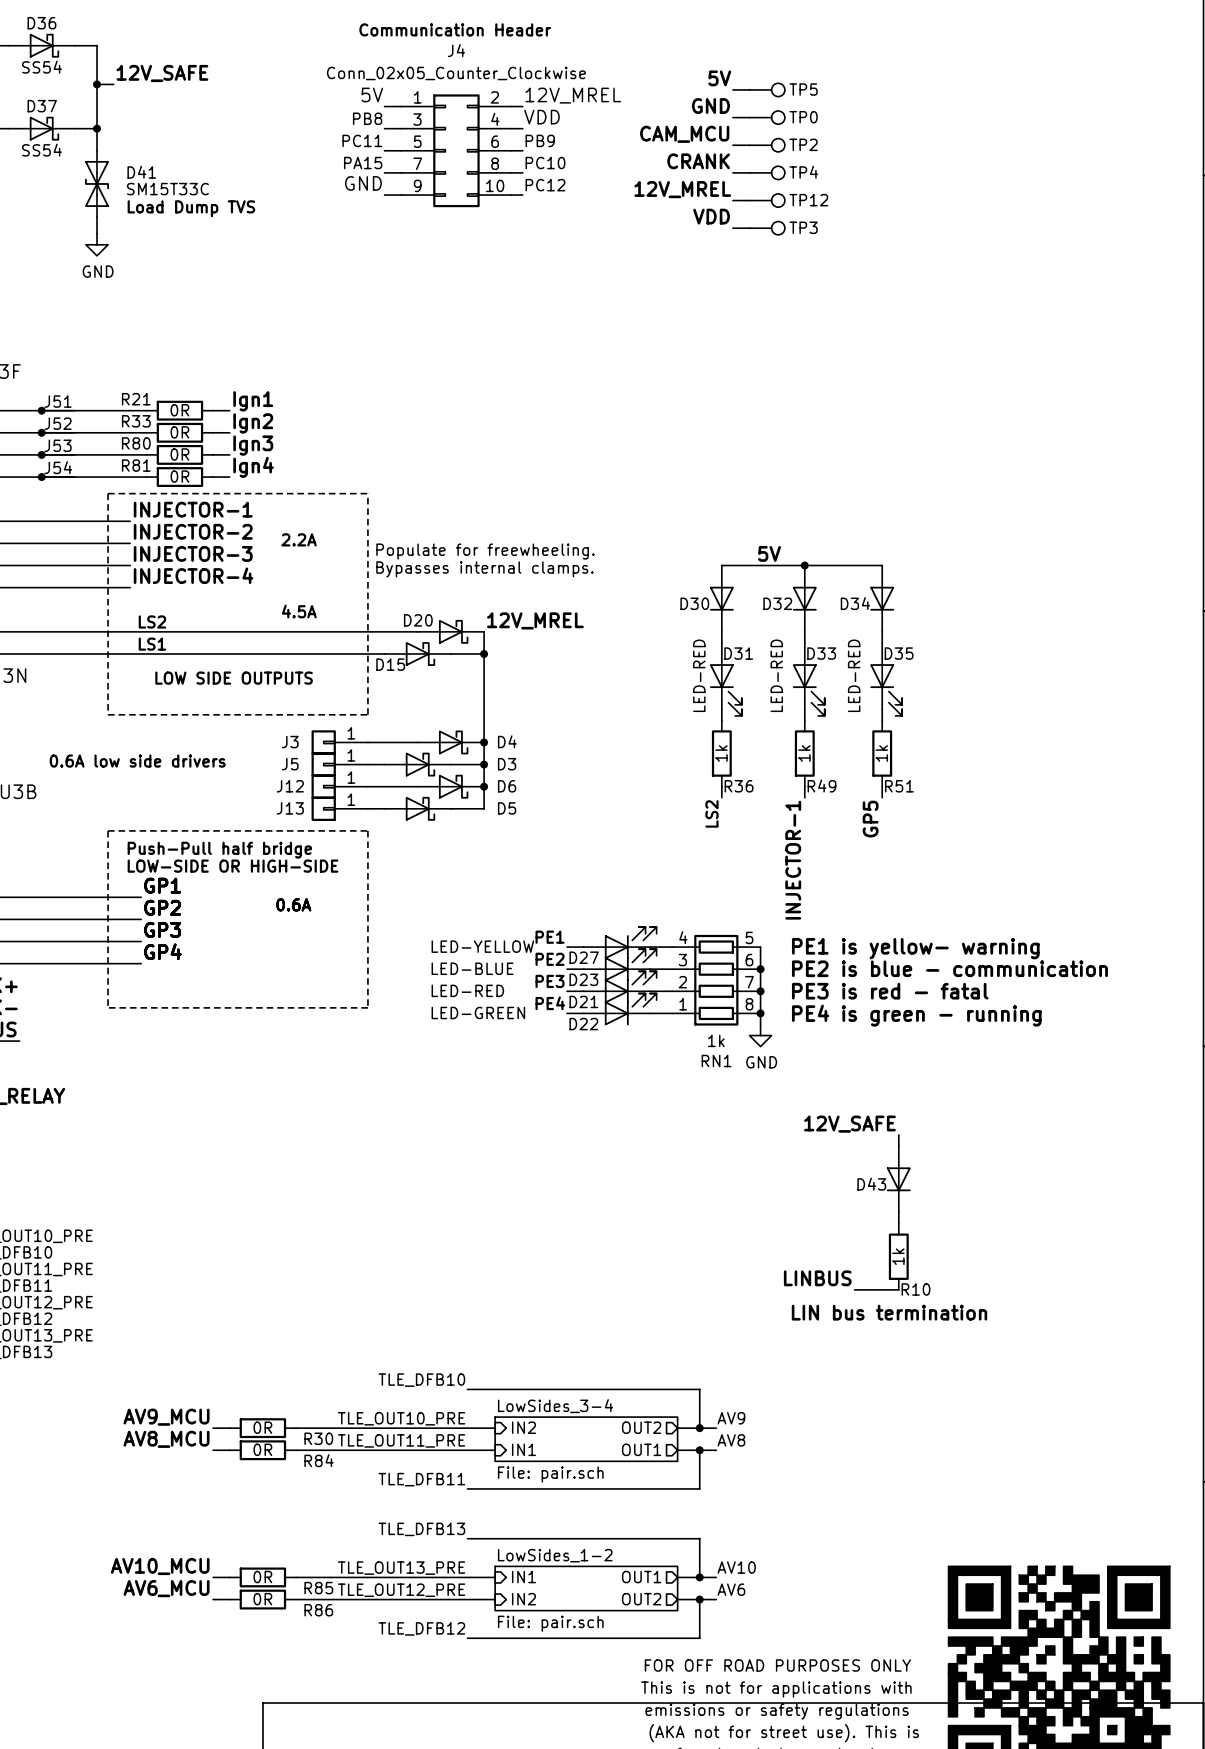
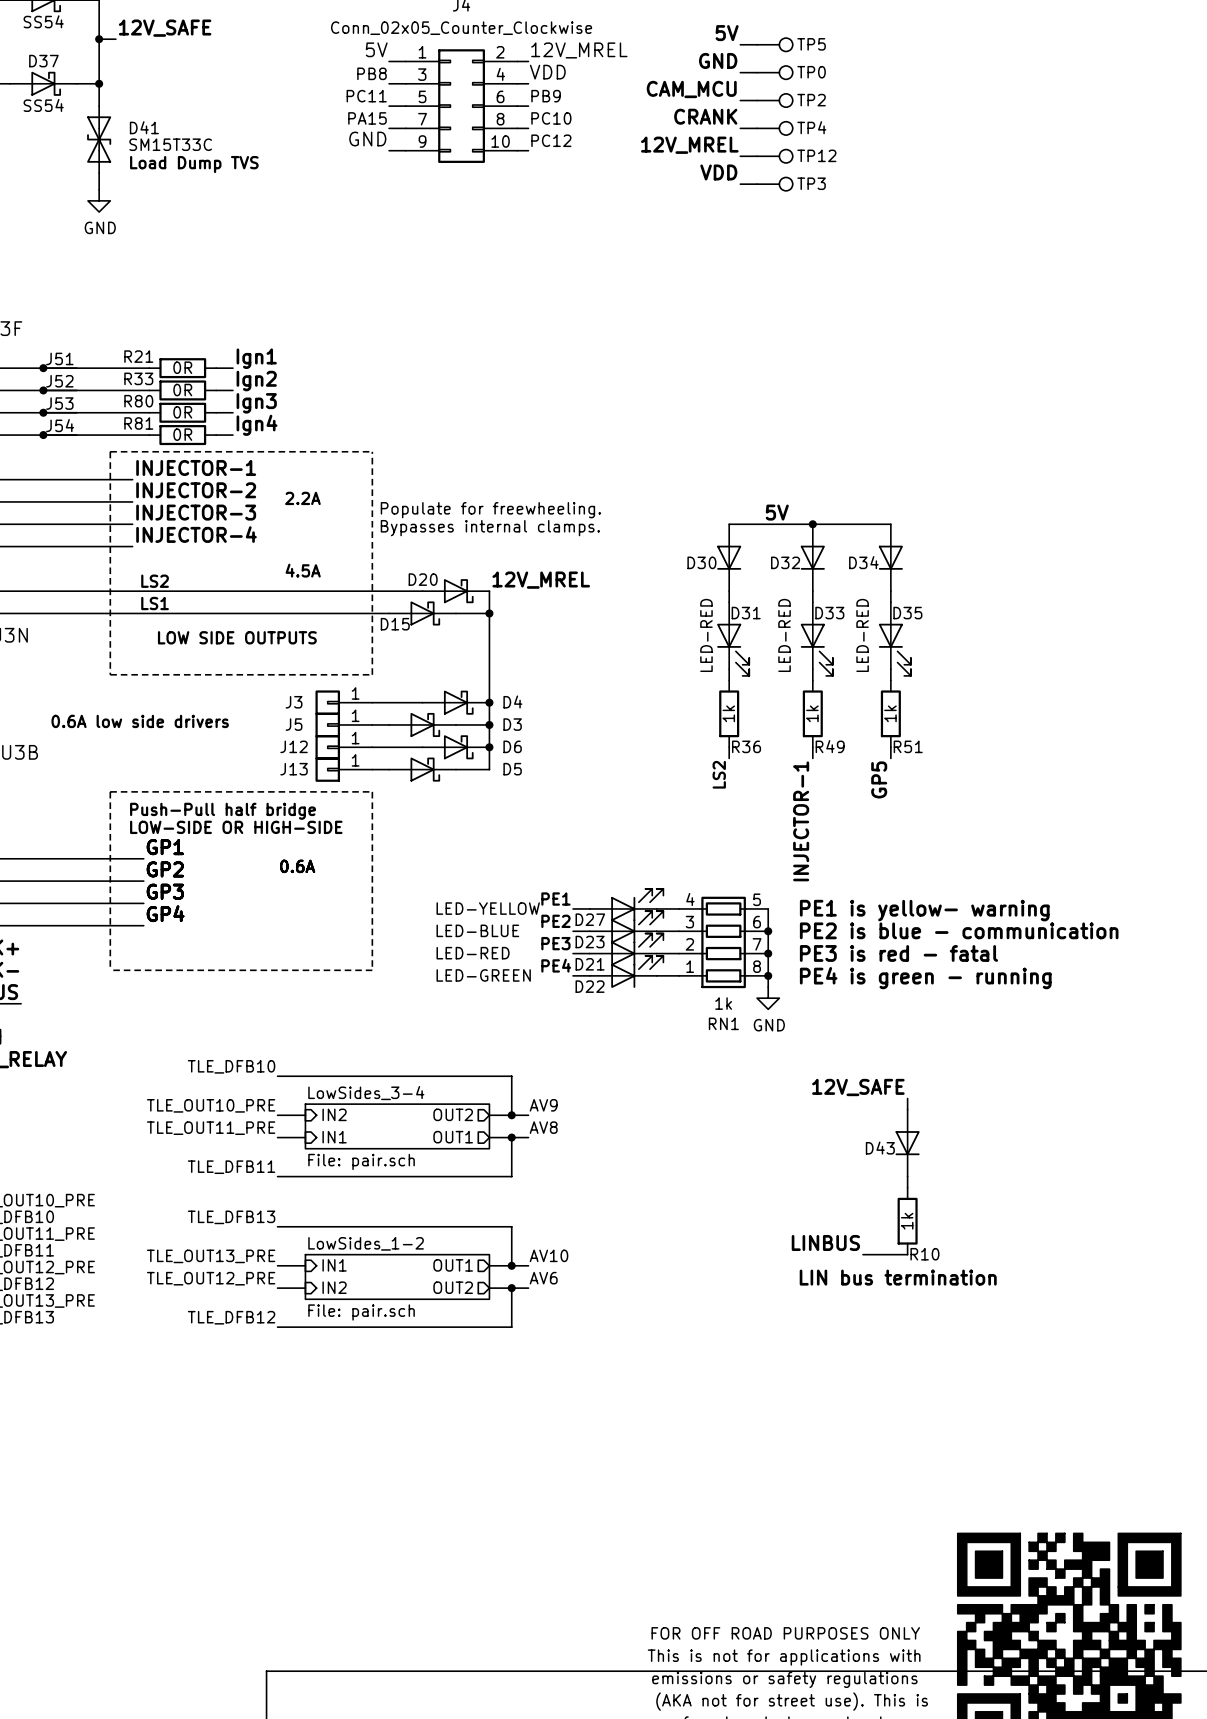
label: none -> TLE_DFB10 (231, 1066)
wire: none -> (277, 1076) (511, 1076) (511, 1115)
label: none -> AV9 (543, 1105)
label: none -> TLE_OUT10_PRE (211, 1105)
wire: none -> (277, 1115) (305, 1115)
sheet pin: none -> IN2 (334, 1114)
sheet pin: none -> OUT2 (453, 1114)
wire: none -> (489, 1115) (528, 1115)
junction: none -> (511, 1115)
label: none -> AV8 (543, 1127)
label: none -> TLE_OUT11_PRE (211, 1128)
wire: none -> (277, 1137) (305, 1137)
sheet pin: none -> IN1 (334, 1137)
sheet pin: none -> OUT1 (453, 1137)
wire: none -> (489, 1137) (528, 1137)
wire: none -> (511, 1137) (511, 1176) (277, 1176)
junction: none -> (511, 1137)
label: none -> TLE_DFB11 (231, 1167)
label: none -> TLE_DFB13 (231, 1217)
wire: none -> (277, 1226) (511, 1226) (511, 1265)
label: none -> TLE_OUT13_PRE (211, 1256)
label: none -> AV10 (548, 1255)
wire: none -> (277, 1265) (305, 1265)
sheet pin: none -> IN1 (334, 1265)
sheet pin: none -> OUT1 (453, 1265)
wire: none -> (489, 1265) (528, 1265)
junction: none -> (511, 1265)
label: none -> TLE_OUT12_PRE (211, 1278)
label: none -> AV6 (543, 1278)
sheet pin: none -> IN2 (334, 1287)
sheet pin: none -> OUT2 (453, 1287)
wire: none -> (277, 1288) (305, 1288)
wire: none -> (489, 1288) (528, 1288)
wire: none -> (511, 1288) (511, 1327) (277, 1327)
junction: none -> (511, 1288)
label: none -> TLE_DFB12 (231, 1317)
label: TLE_DFB10 (421, 1380) -> none
wire: (467, 1389) (699, 1389) (699, 1428) -> none
label: AV9_MCU (166, 1417) -> none
label: TLE_OUT10_PRE (401, 1418) -> none
label: AV9 (731, 1418) -> none
sheet pin: IN2 (524, 1427) -> none
sheet pin: OUT2 (641, 1427) -> none
wire: (213, 1428) (229, 1428) -> none
R30: 0R (262, 1428) -> none
wire: (296, 1428) (495, 1428) -> none
wire: (677, 1428) (716, 1428) -> none
junction: (699, 1428) -> none
label: AV8_MCU (166, 1439) -> none
sheet LowSides_3-4 position: (586, 1439) -> (397, 1126)
label: TLE_OUT11_PRE (401, 1440) -> none
label: AV8 (731, 1440) -> none
sheet pin: IN1 (524, 1449) -> none
sheet pin: OUT1 (641, 1449) -> none
wire: (213, 1450) (229, 1450) -> none
R84: 0R (262, 1450) -> none
wire: (296, 1450) (495, 1450) -> none
wire: (677, 1450) (716, 1450) -> none
wire: (699, 1450) (699, 1488) (467, 1488) -> none
junction: (699, 1450) -> none
label: TLE_DFB11 (421, 1479) -> none
label: TLE_DFB13 (421, 1529) -> none
wire: (467, 1538) (699, 1538) (699, 1577) -> none
label: AV10_MCU (160, 1566) -> none
label: AV10 (736, 1567) -> none
label: TLE_OUT13_PRE (401, 1568) -> none
wire: (213, 1577) (229, 1577) -> none
R85: 0R (262, 1577) -> none
wire: (296, 1577) (495, 1577) -> none
sheet pin: IN1 (524, 1577) -> none
sheet pin: OUT1 (641, 1577) -> none
wire: (677, 1577) (716, 1577) -> none
junction: (699, 1577) -> none
label: AV6_MCU (166, 1588) -> none
sheet LowSides_1-2 position: (586, 1588) -> (397, 1276)
label: AV6 (731, 1589) -> none
label: TLE_OUT12_PRE (401, 1590) -> none
wire: (213, 1599) (229, 1599) -> none
R86: 0R (262, 1599) -> none
wire: (296, 1599) (495, 1599) -> none
sheet pin: IN2 (524, 1599) -> none
sheet pin: OUT2 (641, 1599) -> none
wire: (677, 1599) (716, 1599) -> none
wire: (699, 1599) (699, 1638) (467, 1638) -> none
junction: (699, 1599) -> none
label: TLE_DFB12 (421, 1628) -> none

